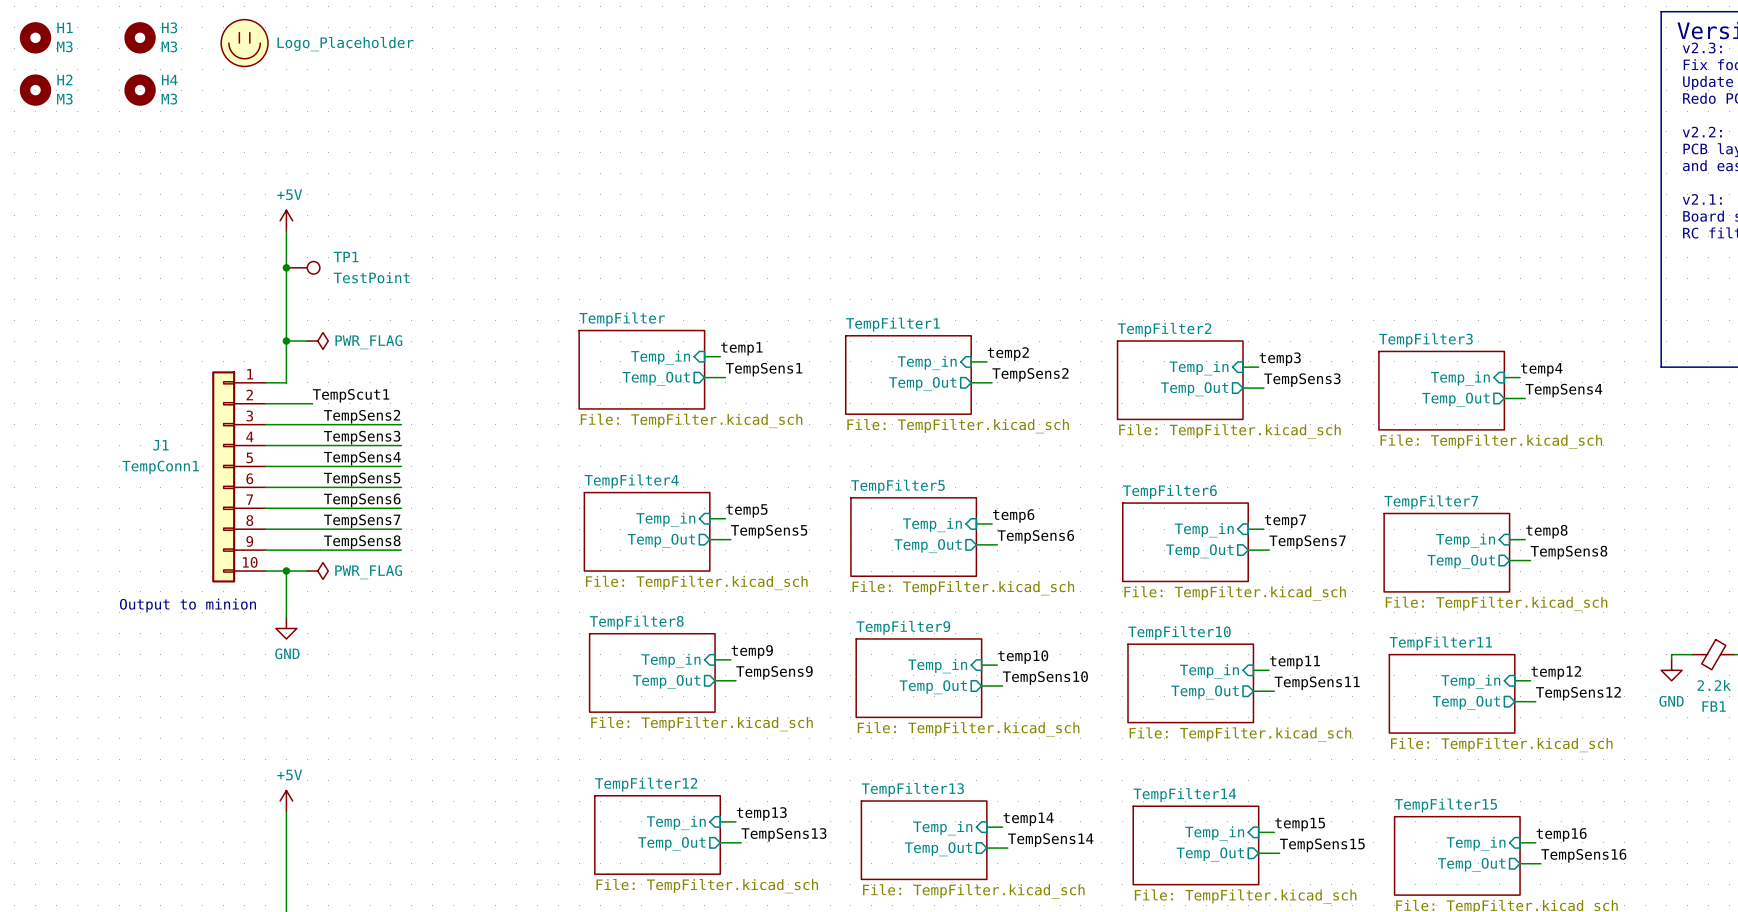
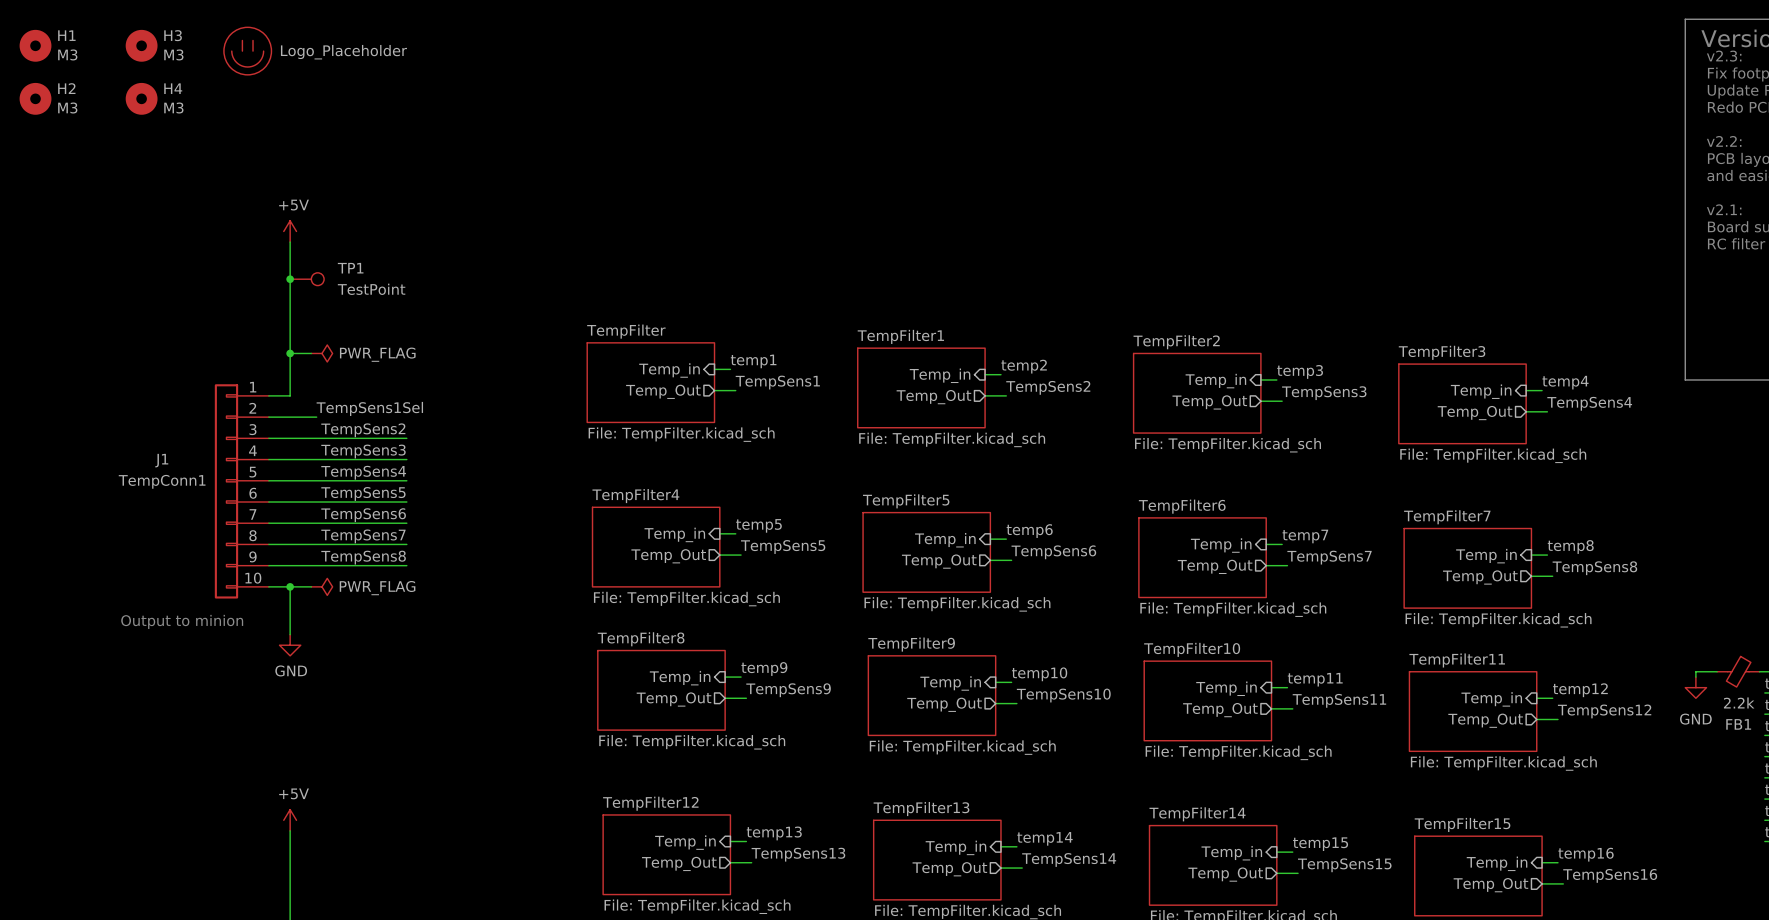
label: TempScut1 (351, 395) -> TempSens1Sel (369, 408)

